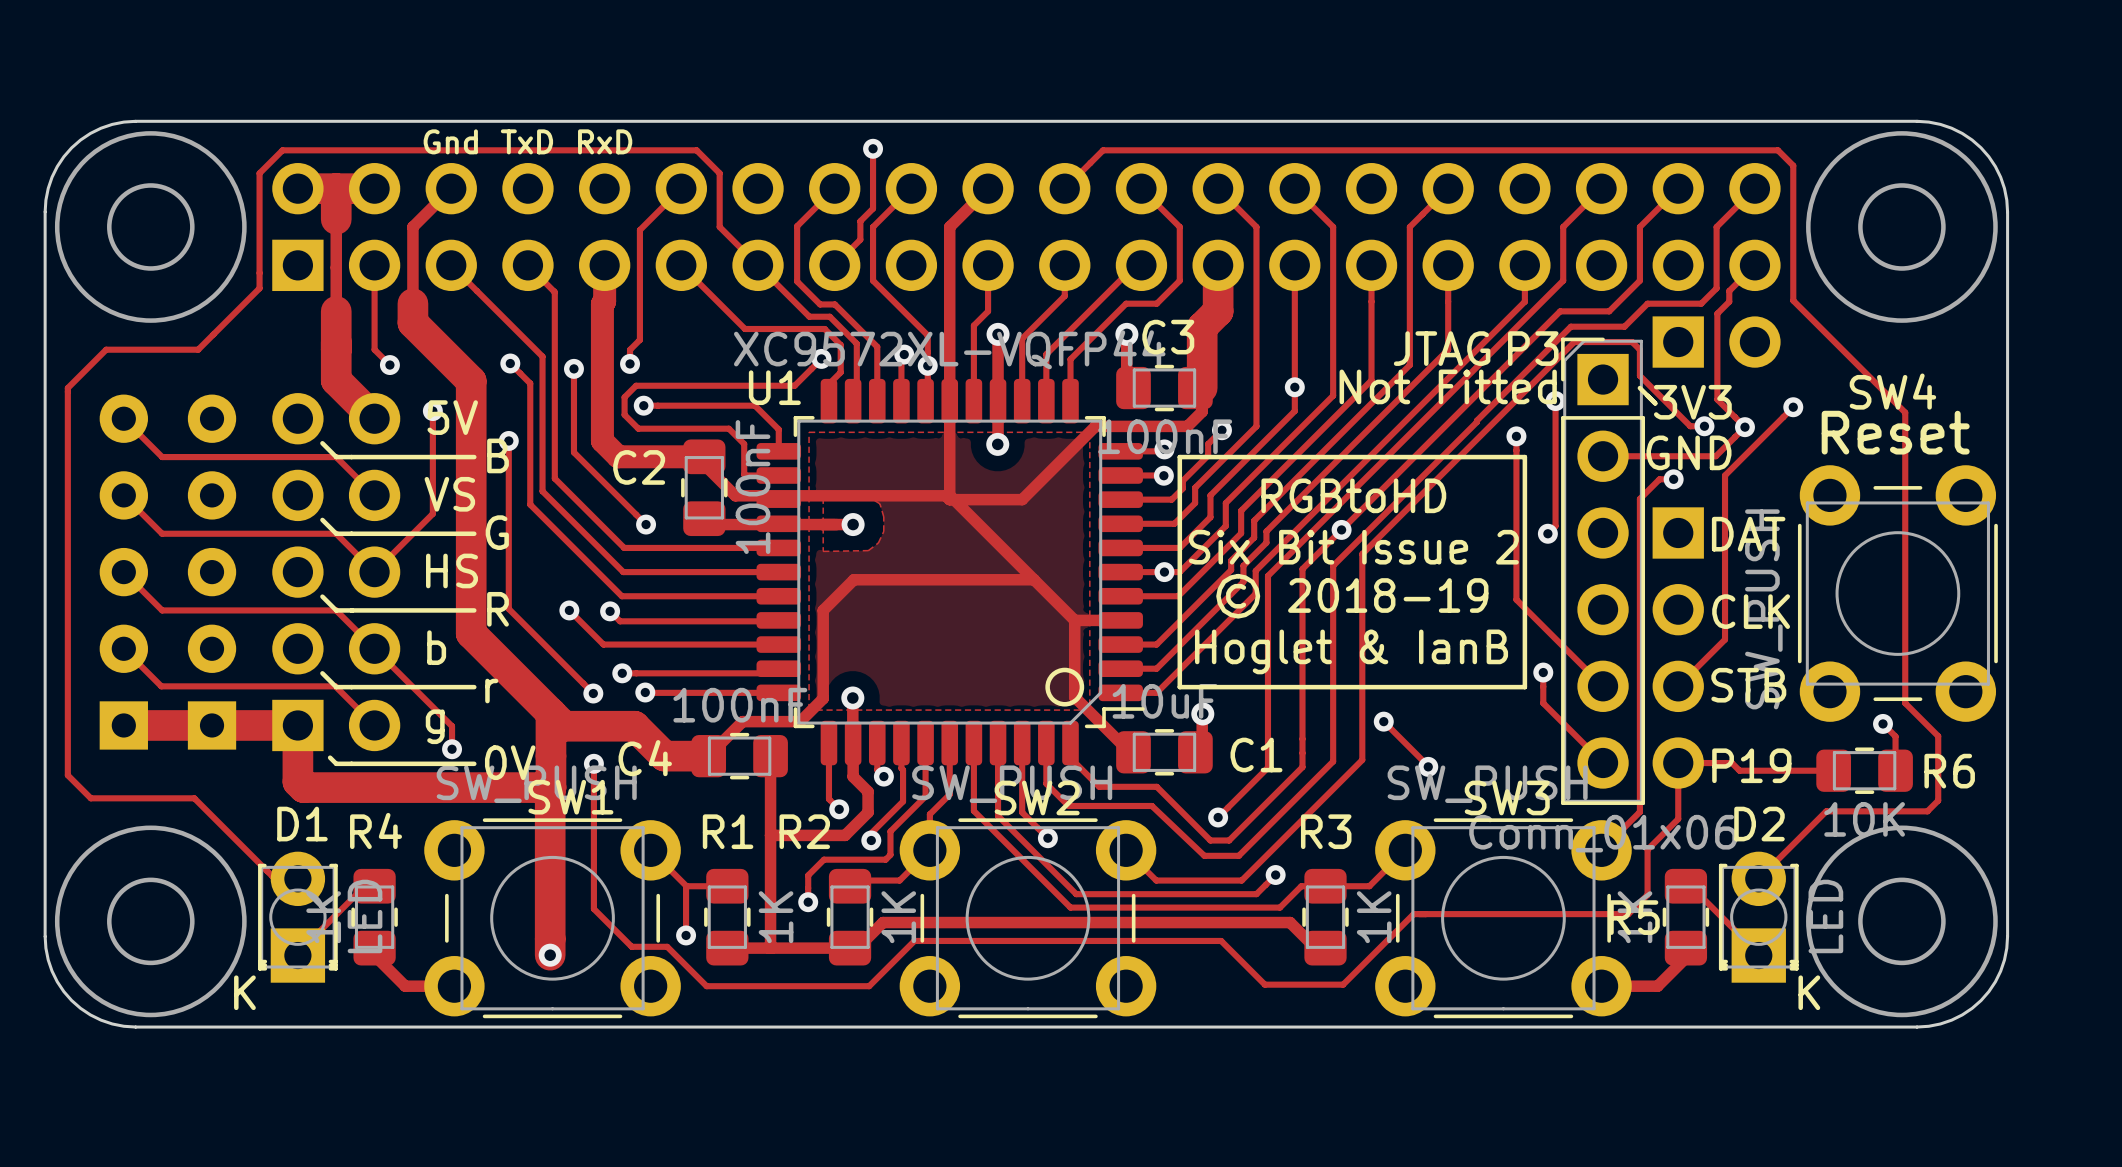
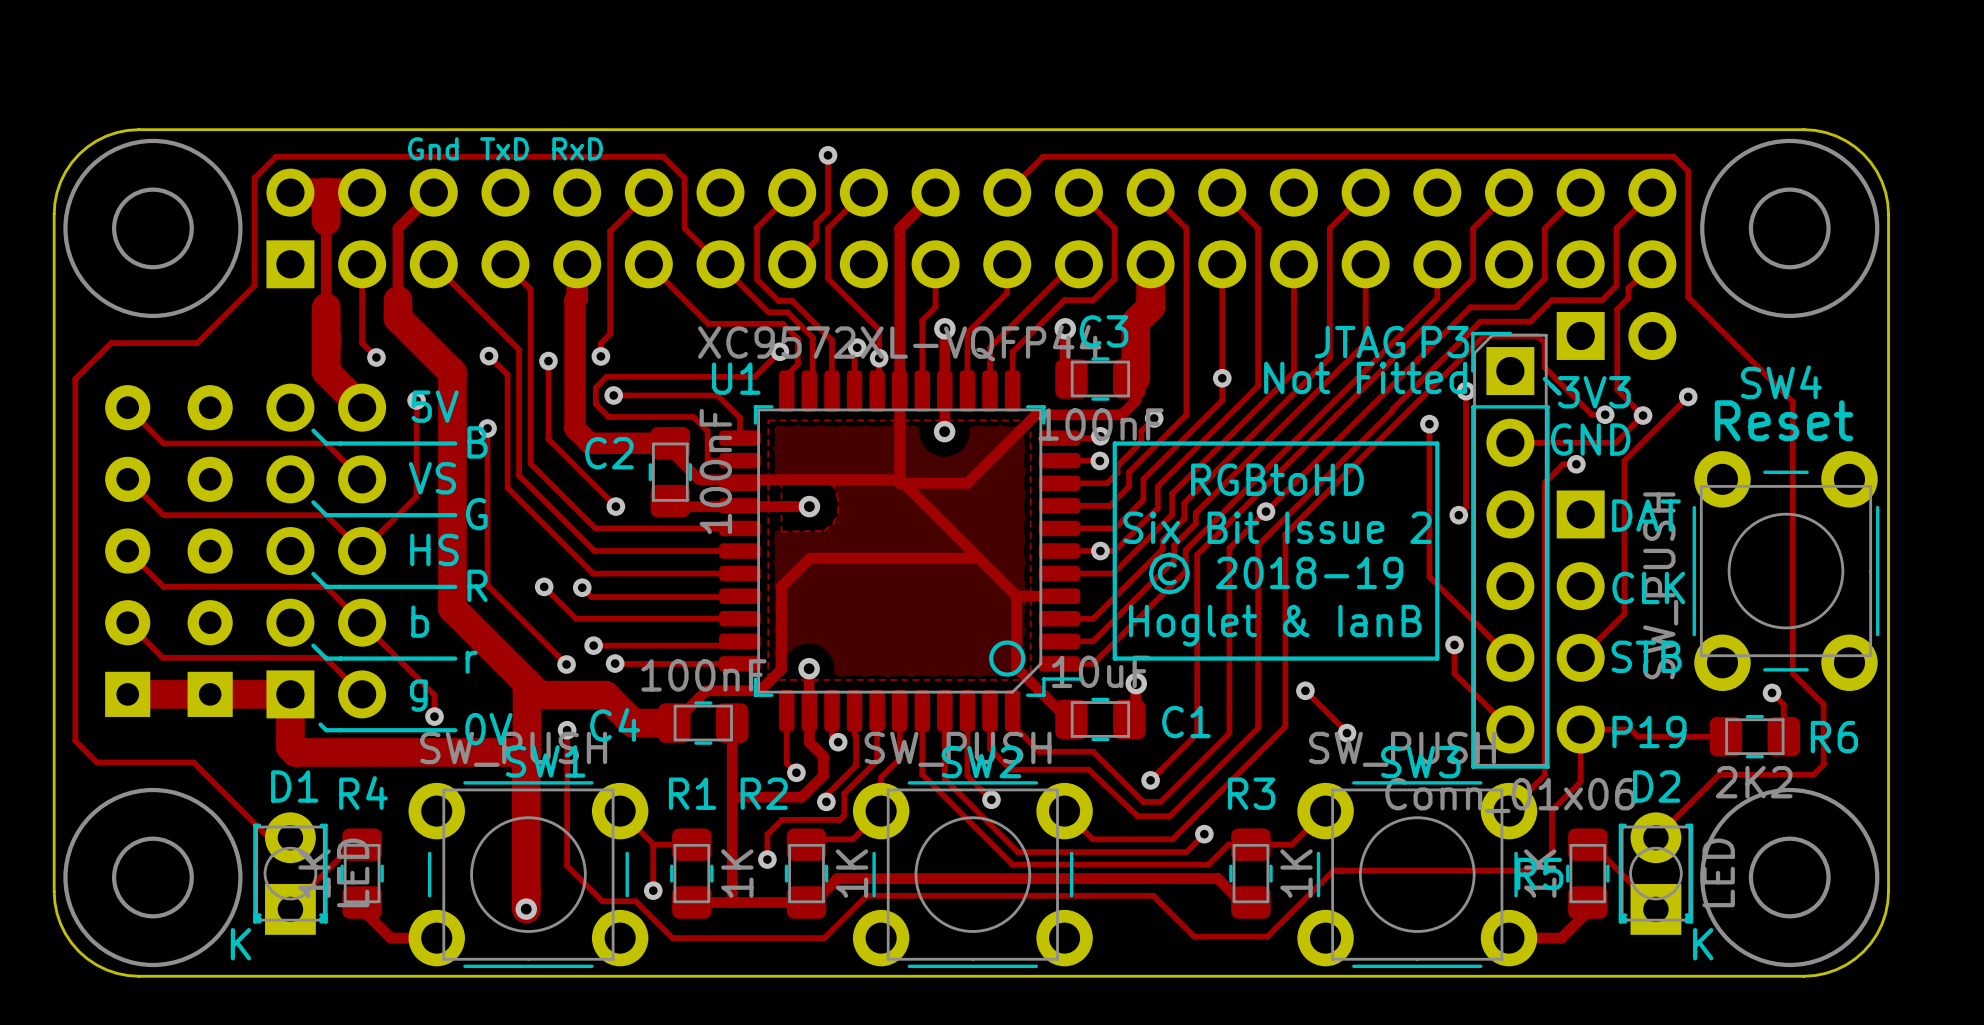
R6 value: 10K (1864, 819) -> 2K2 (1754, 782)

